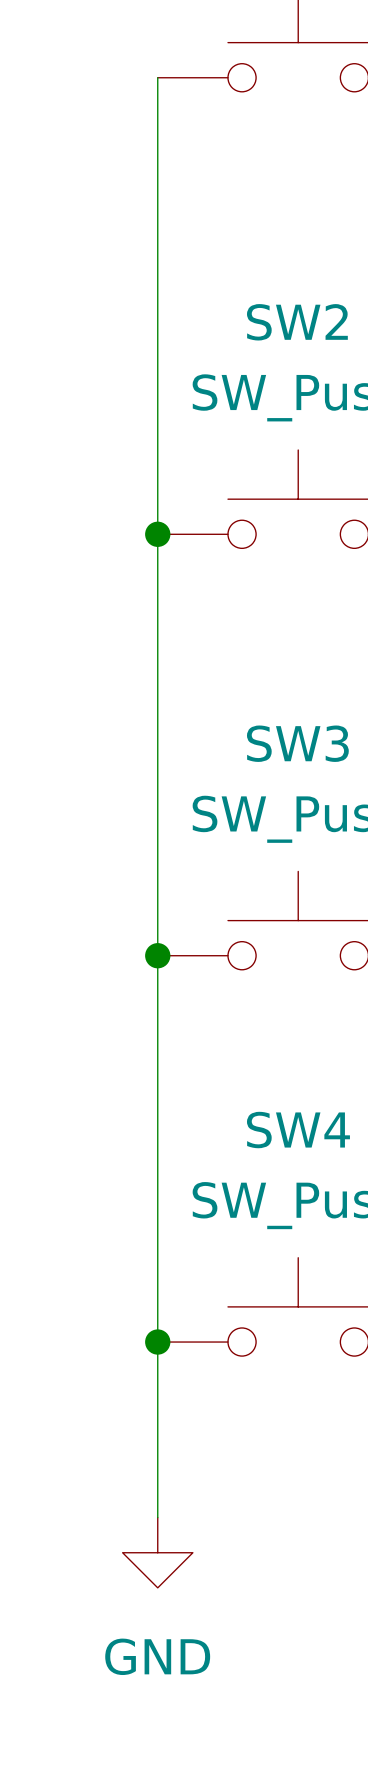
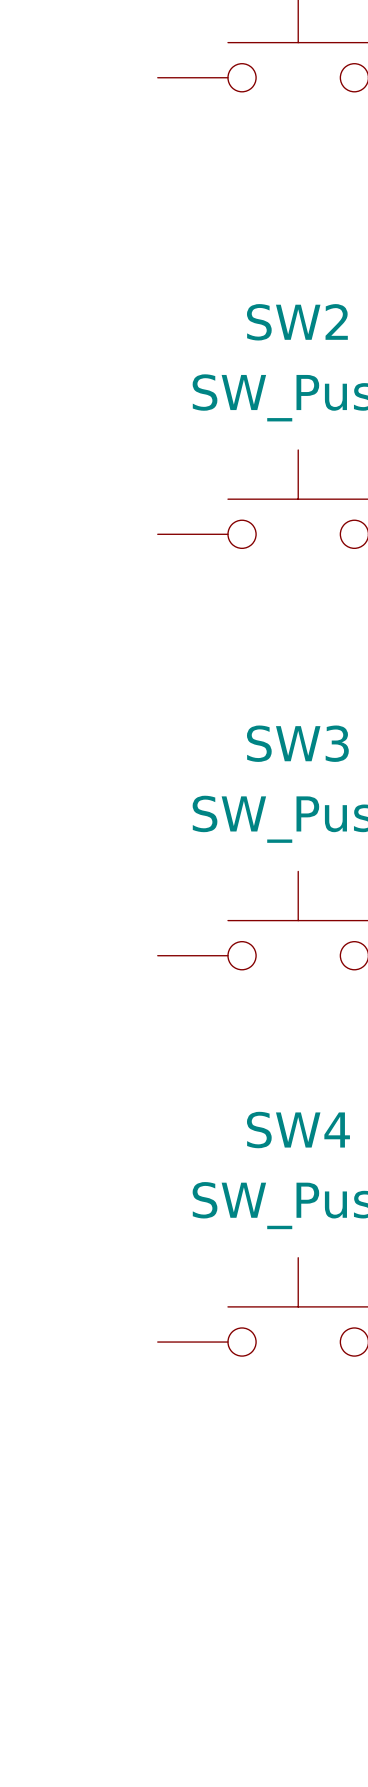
wire: (157, 77) (157, 1517) -> none
junction: (157, 534) -> none
junction: (157, 955) -> none
junction: (157, 1342) -> none
power symbol: GND (157, 1552) -> none

